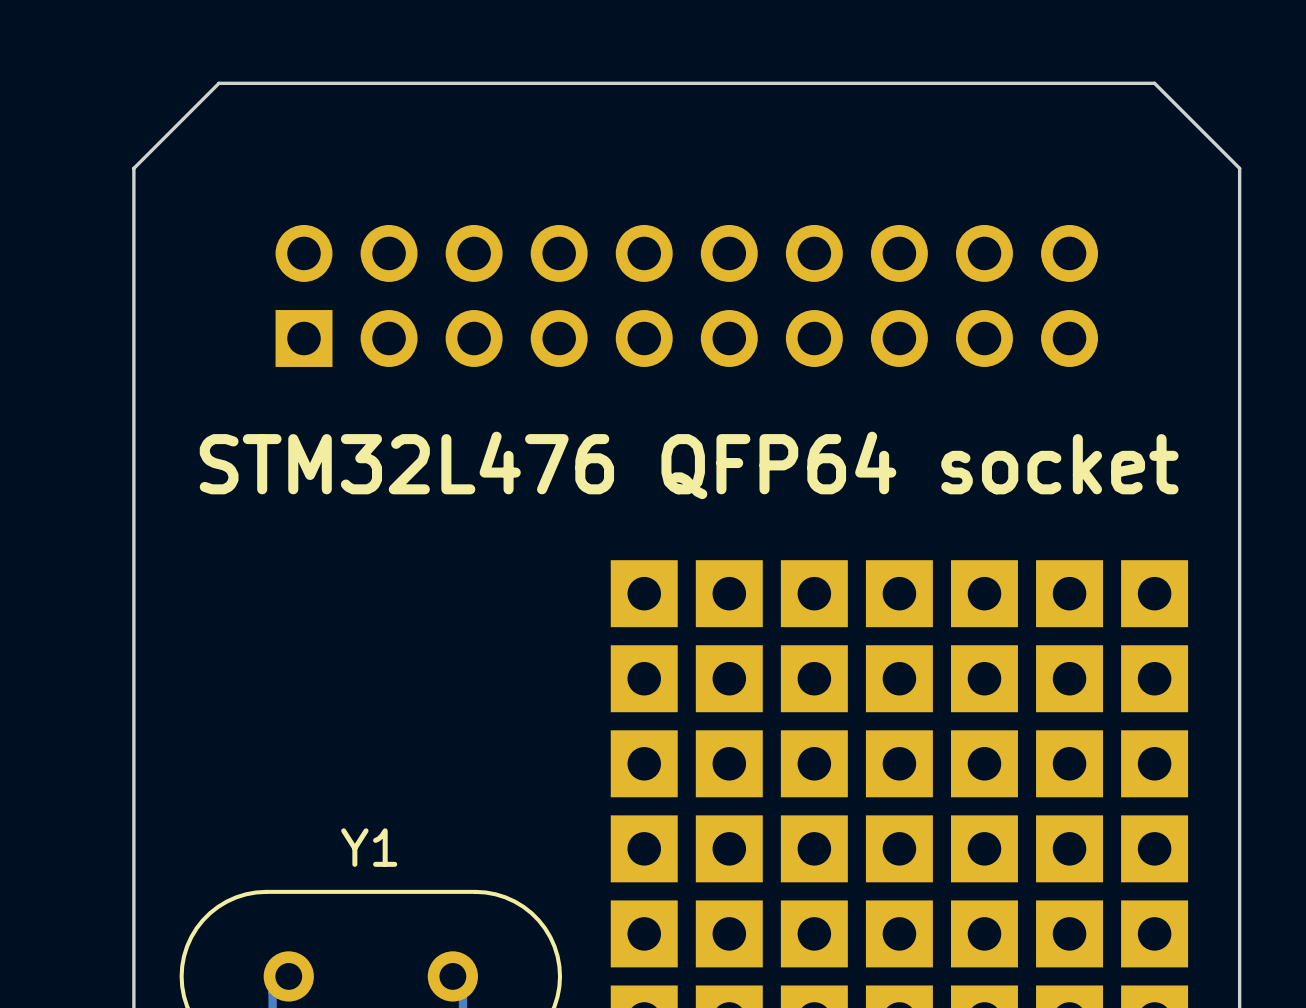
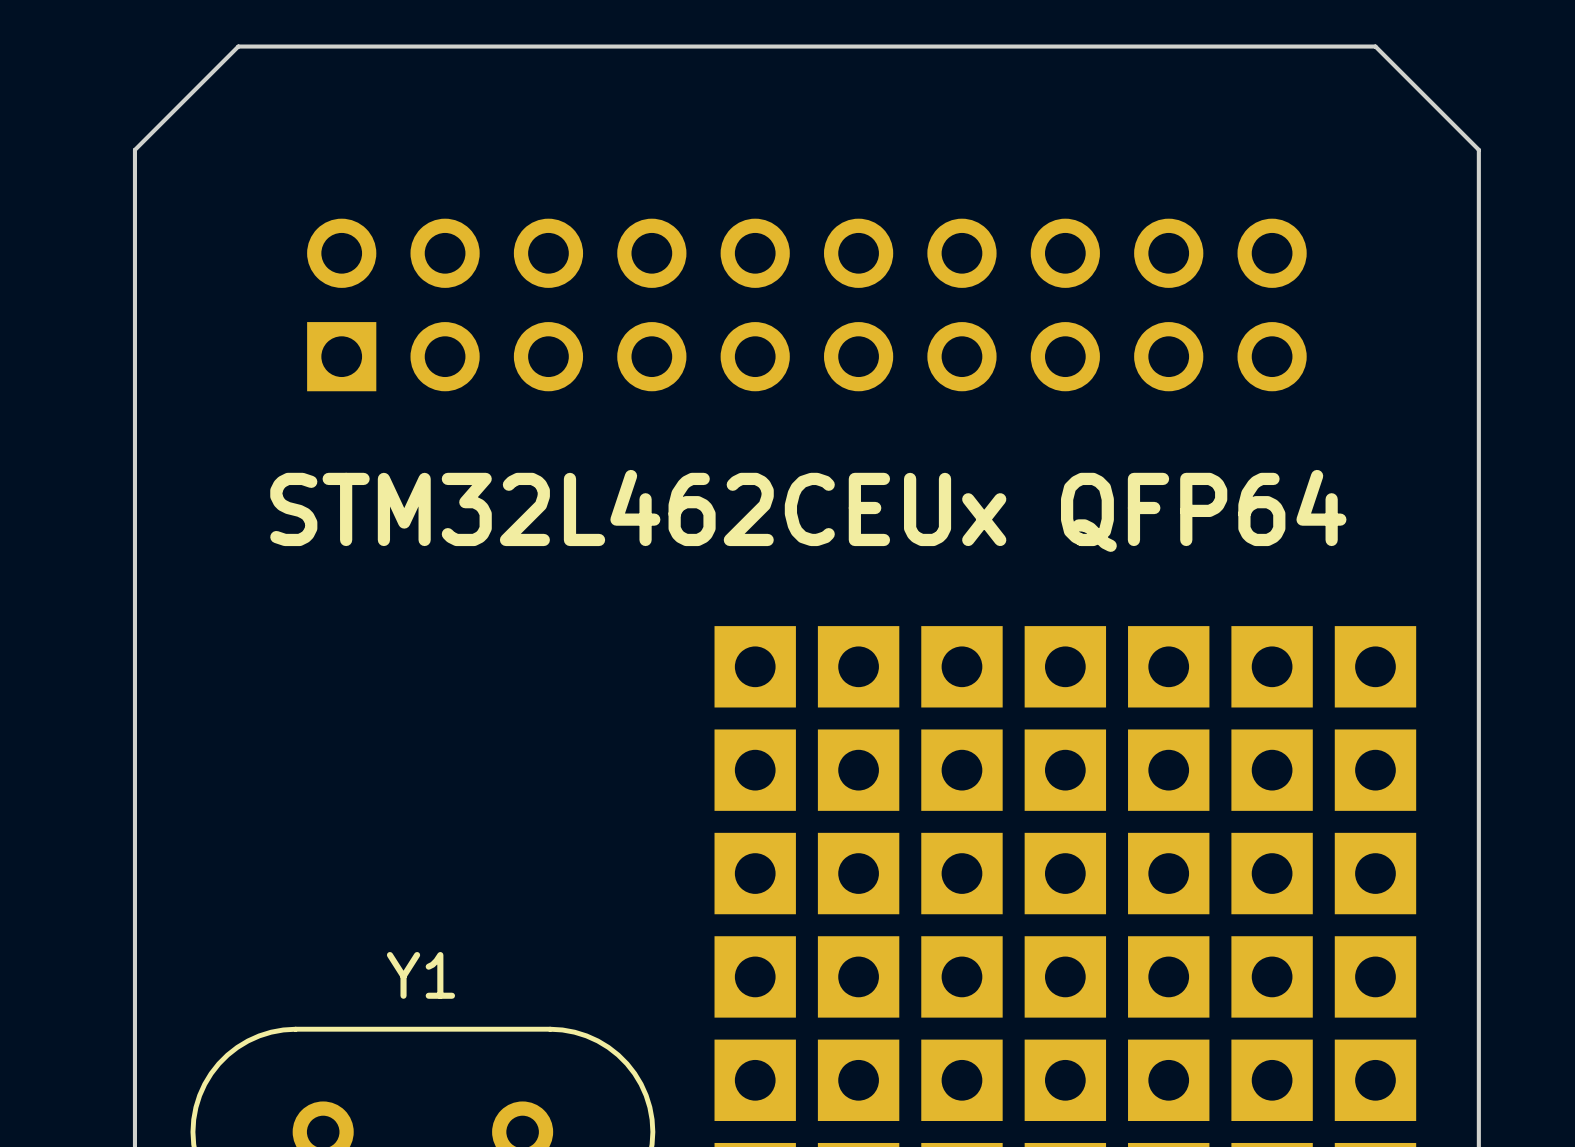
text: STM32L476 QFP64 socket (689, 465) -> STM32L462CEUx QFP64 (808, 510)

